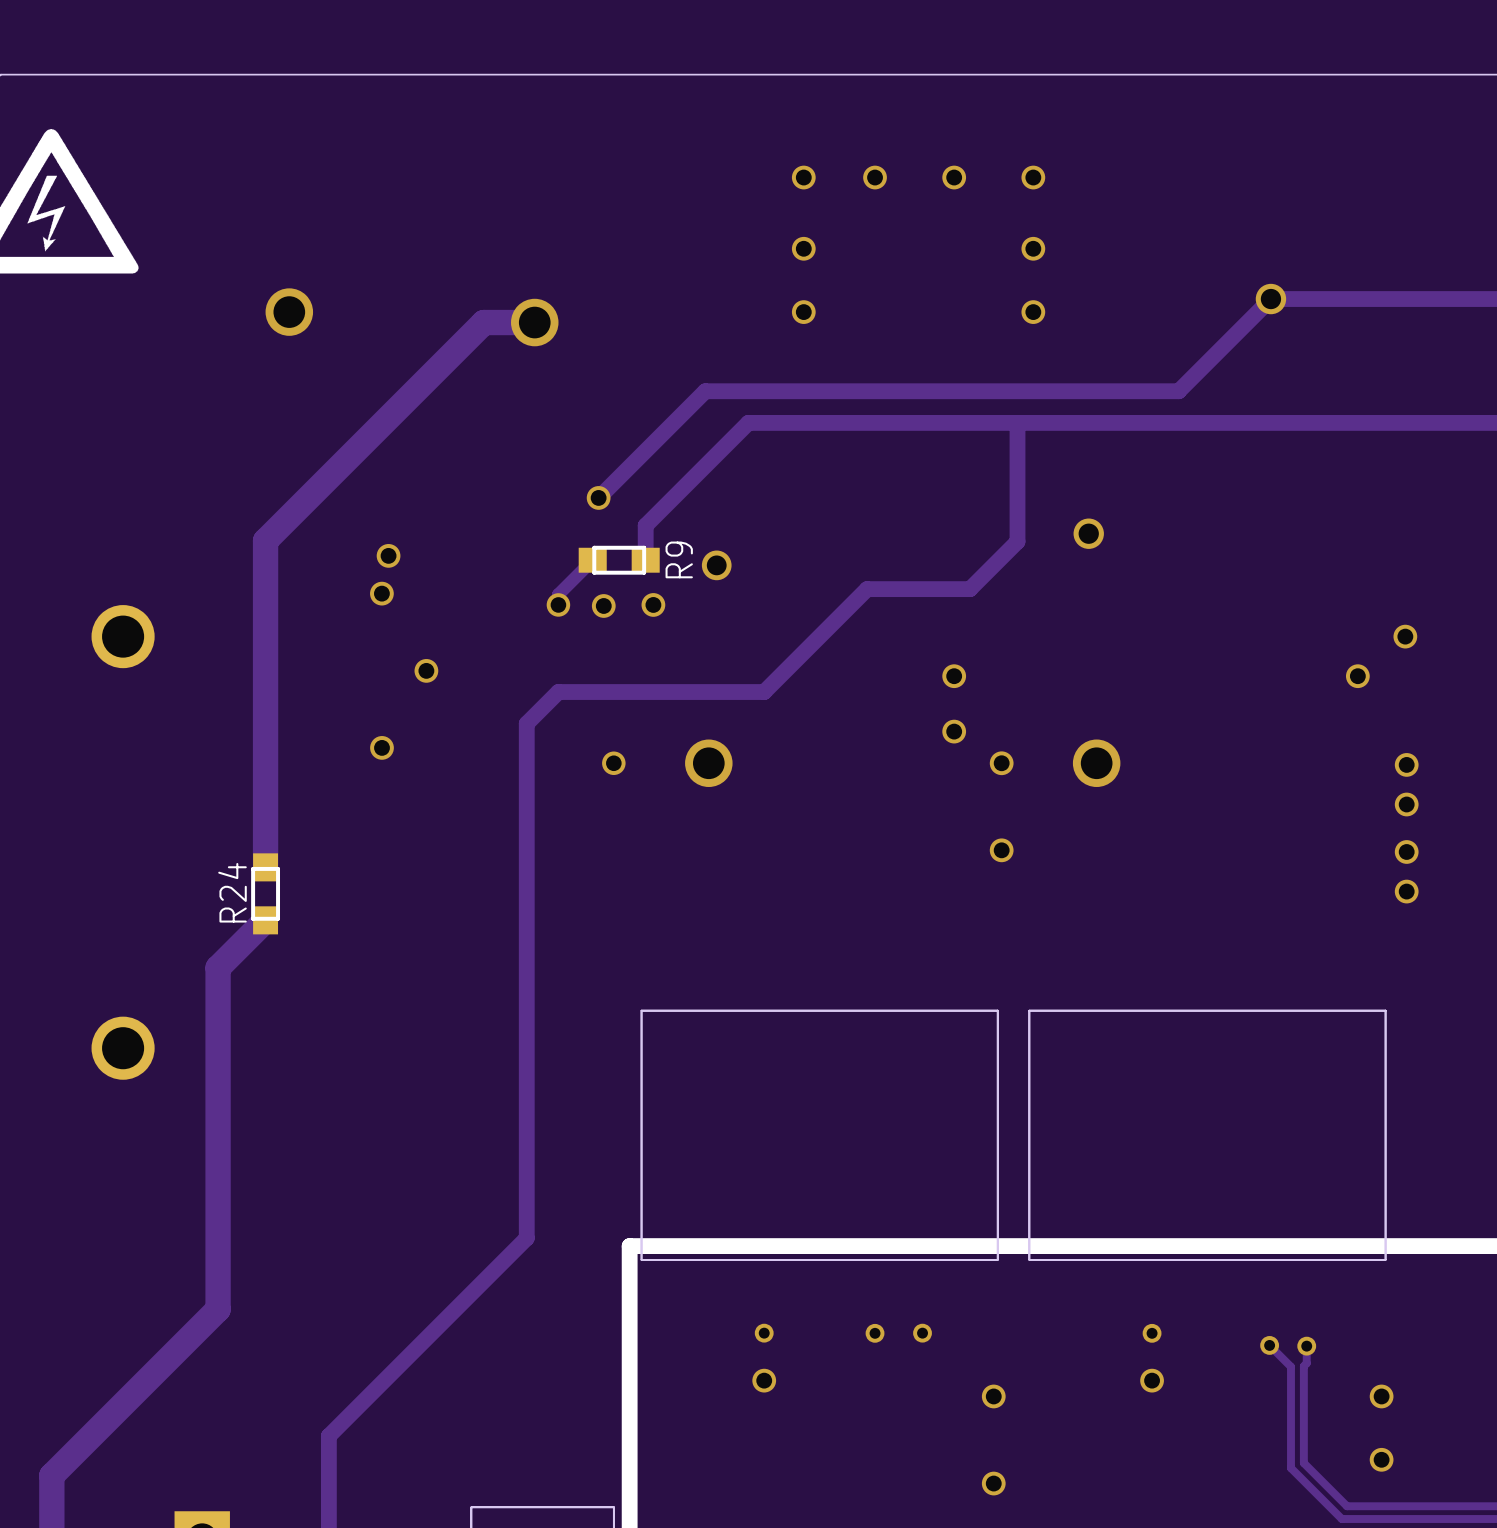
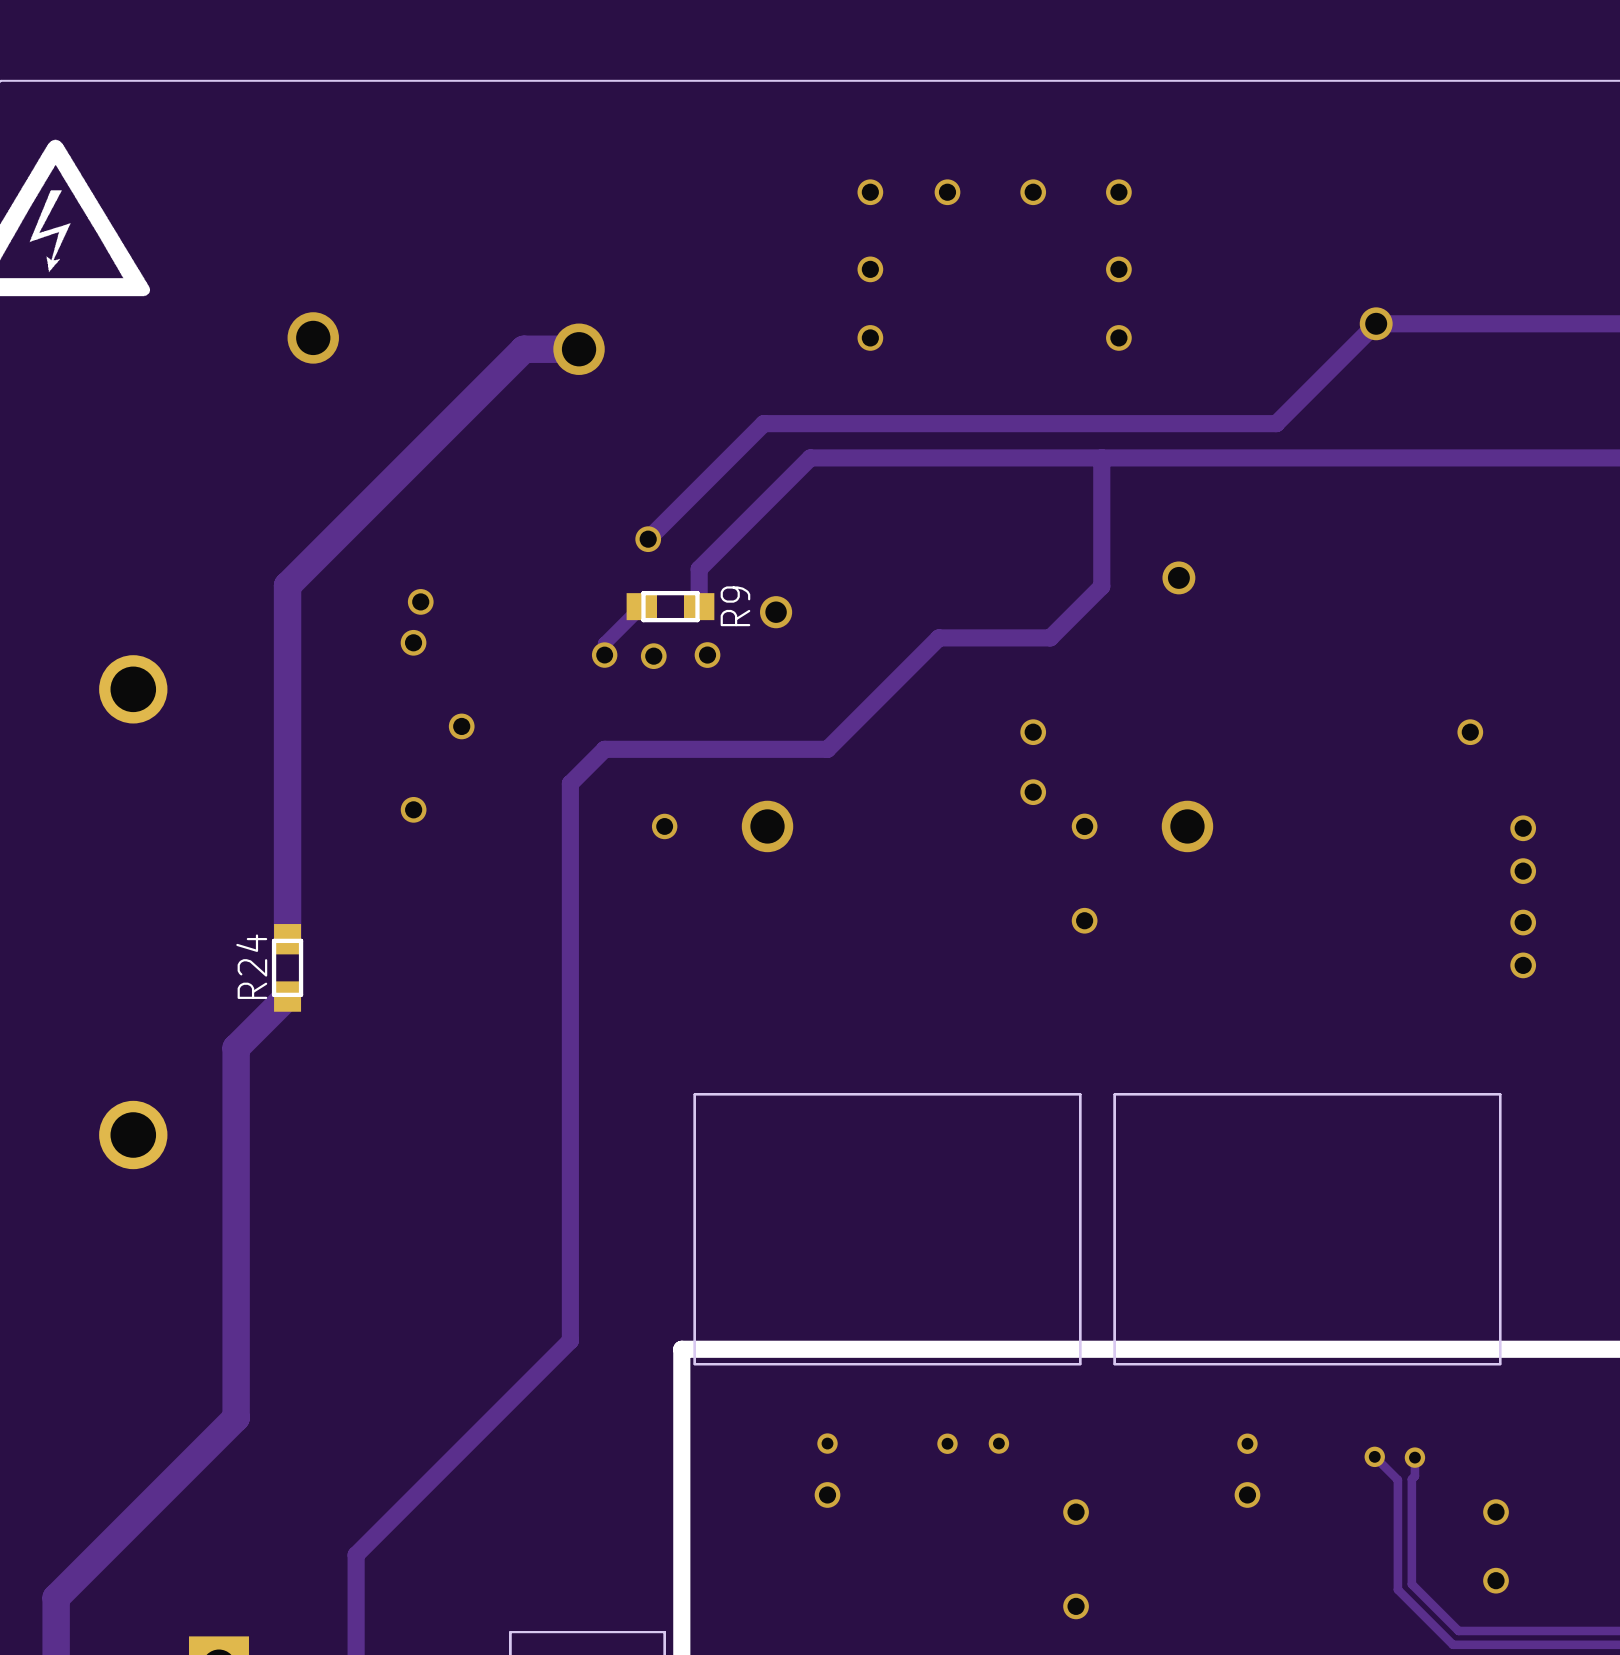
via: (1405, 636) -> none

